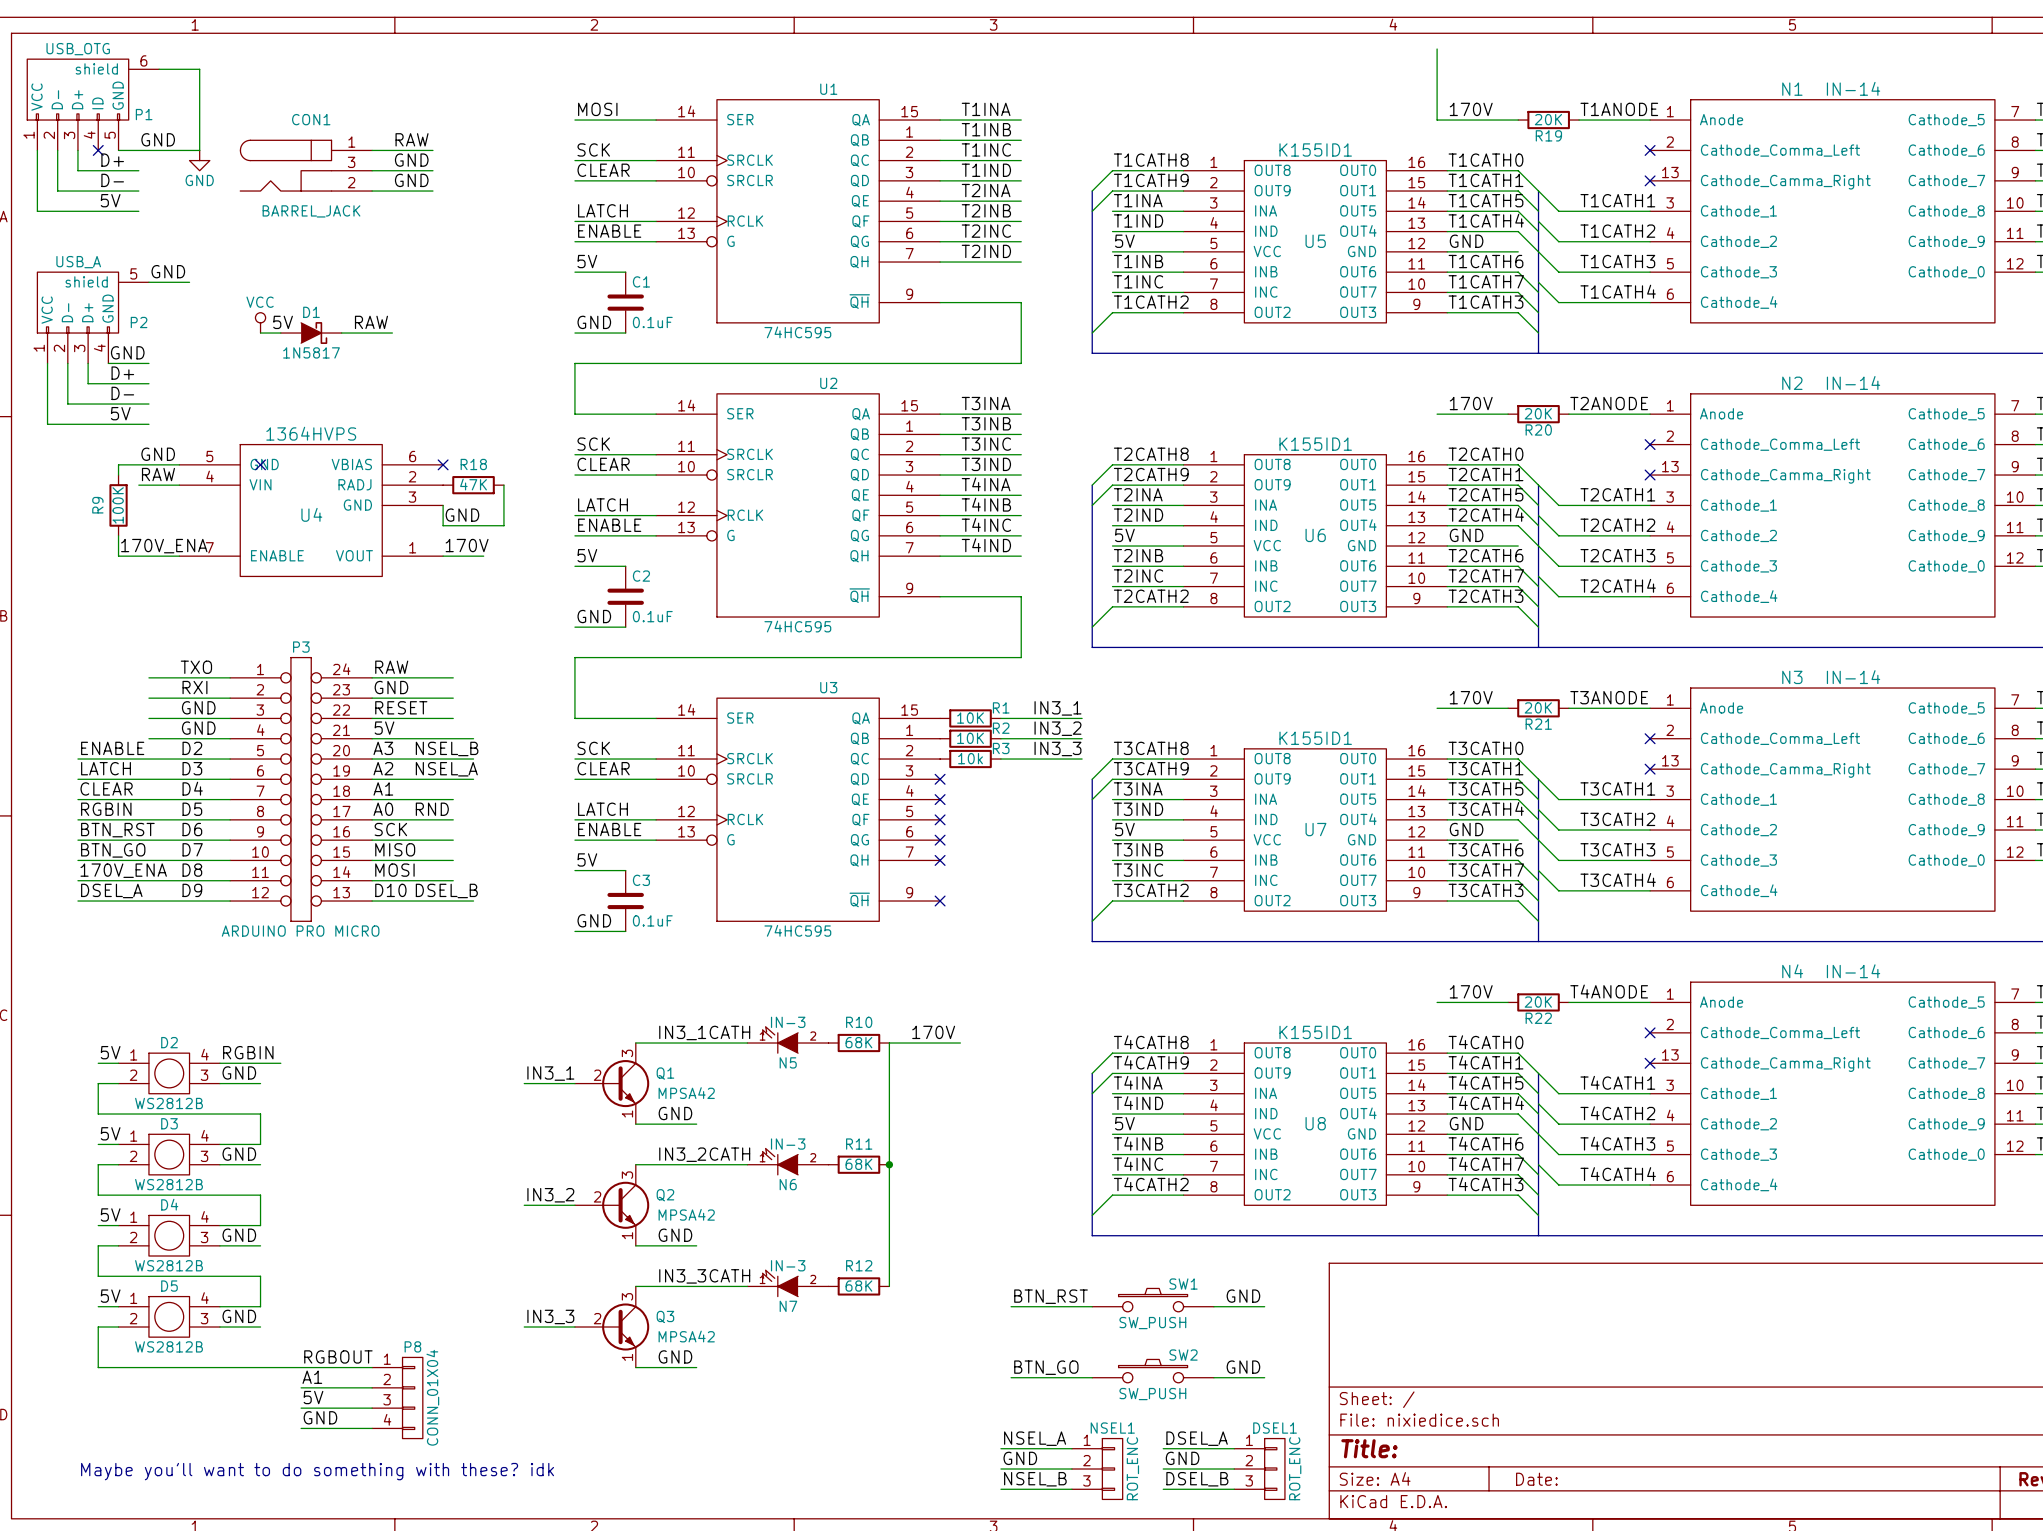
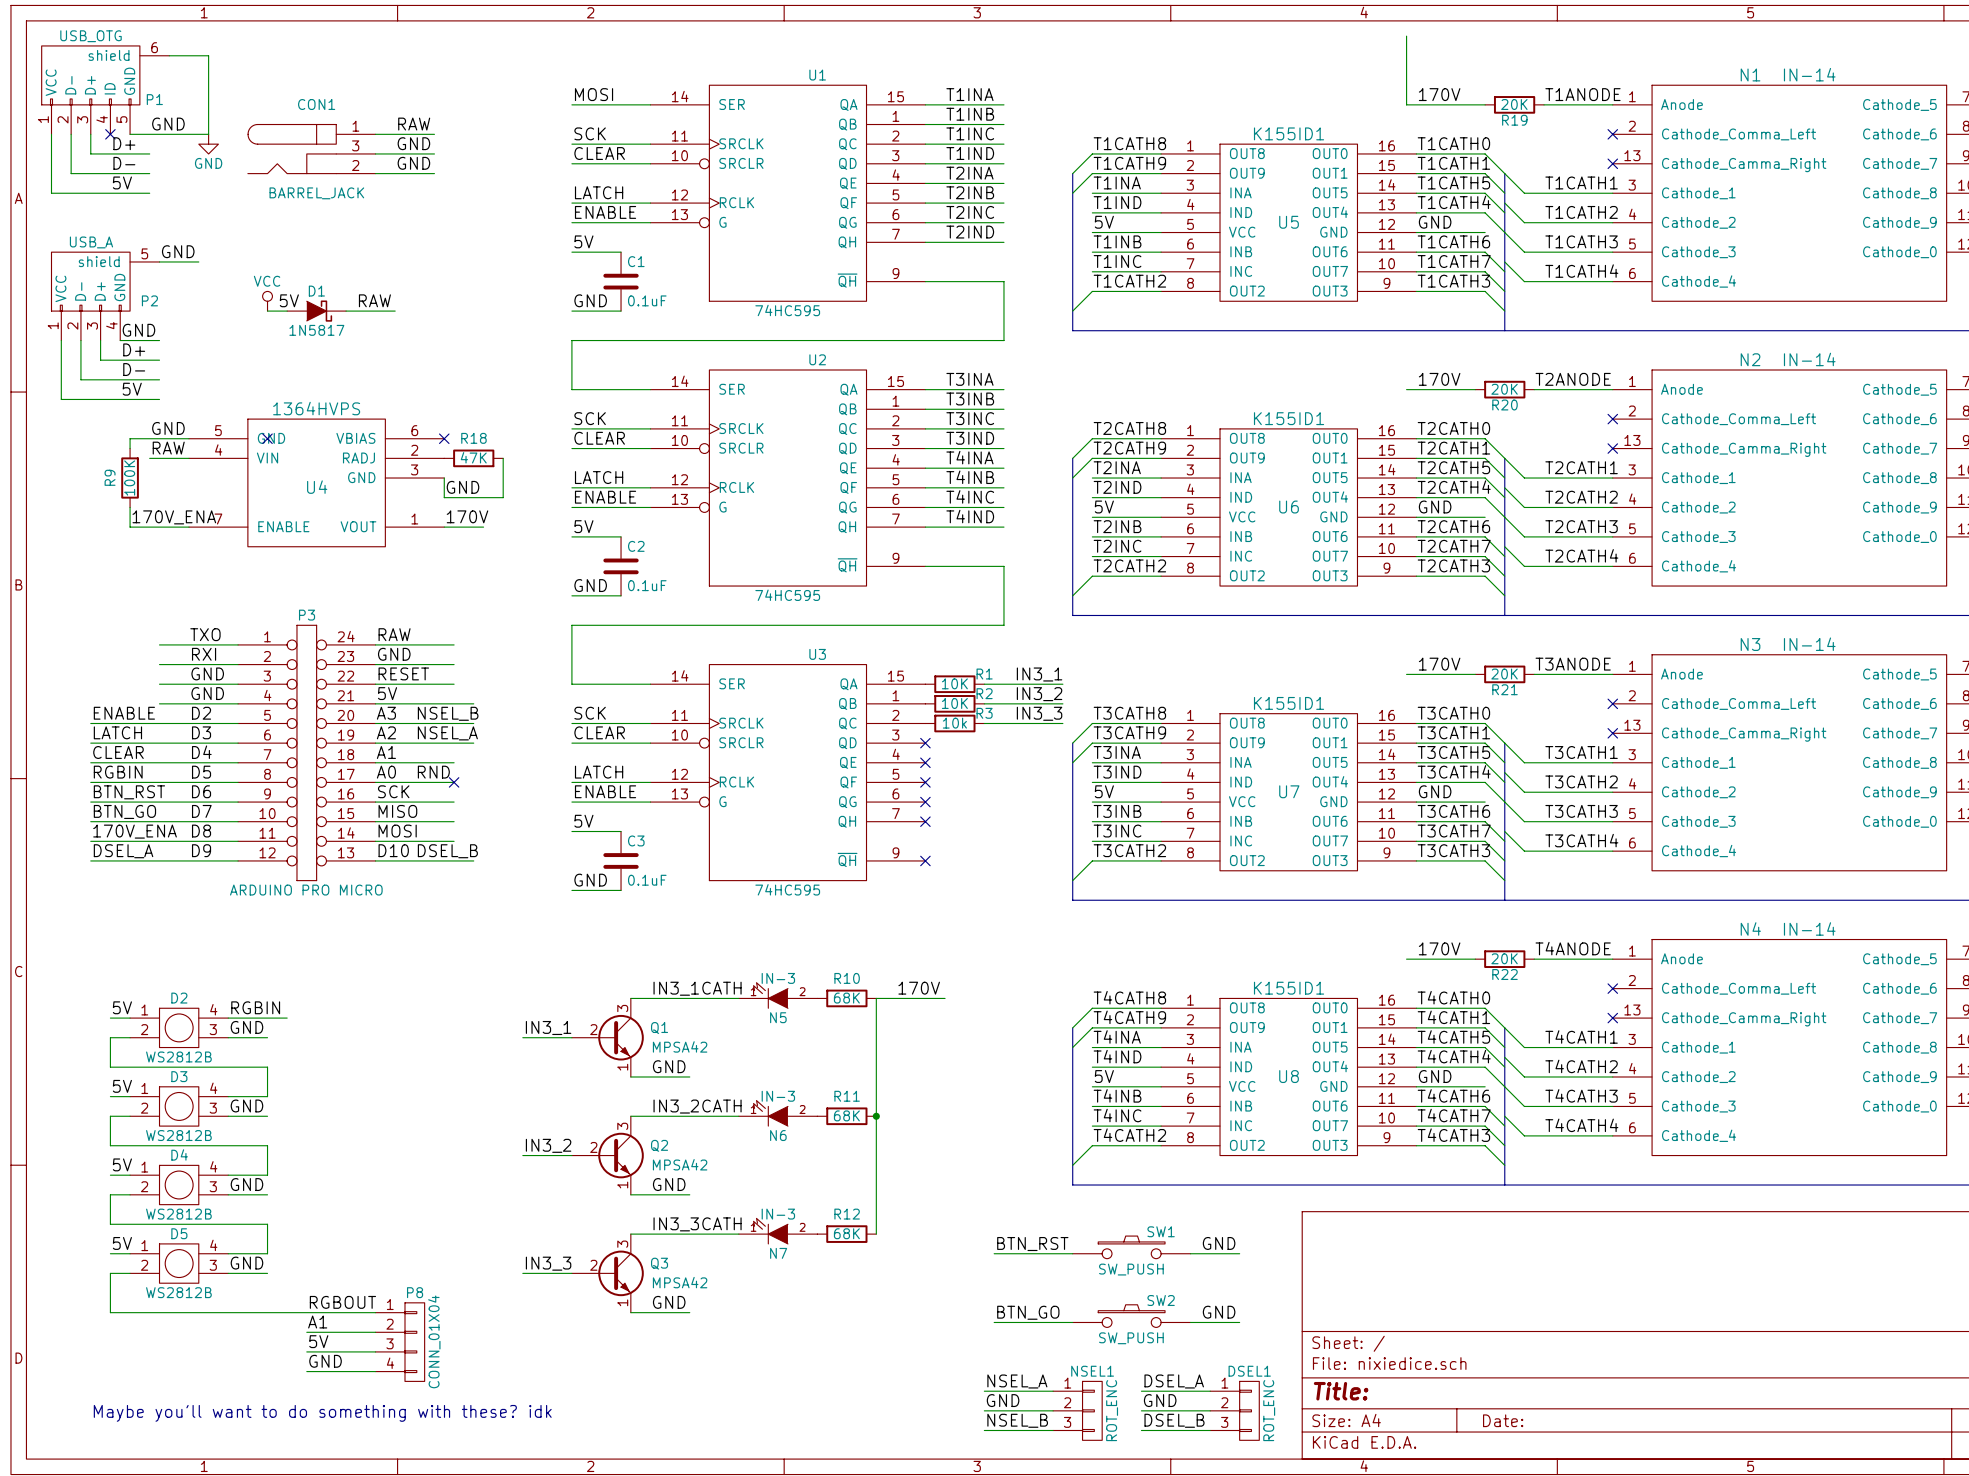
no-connect mark: none -> (454, 782)

